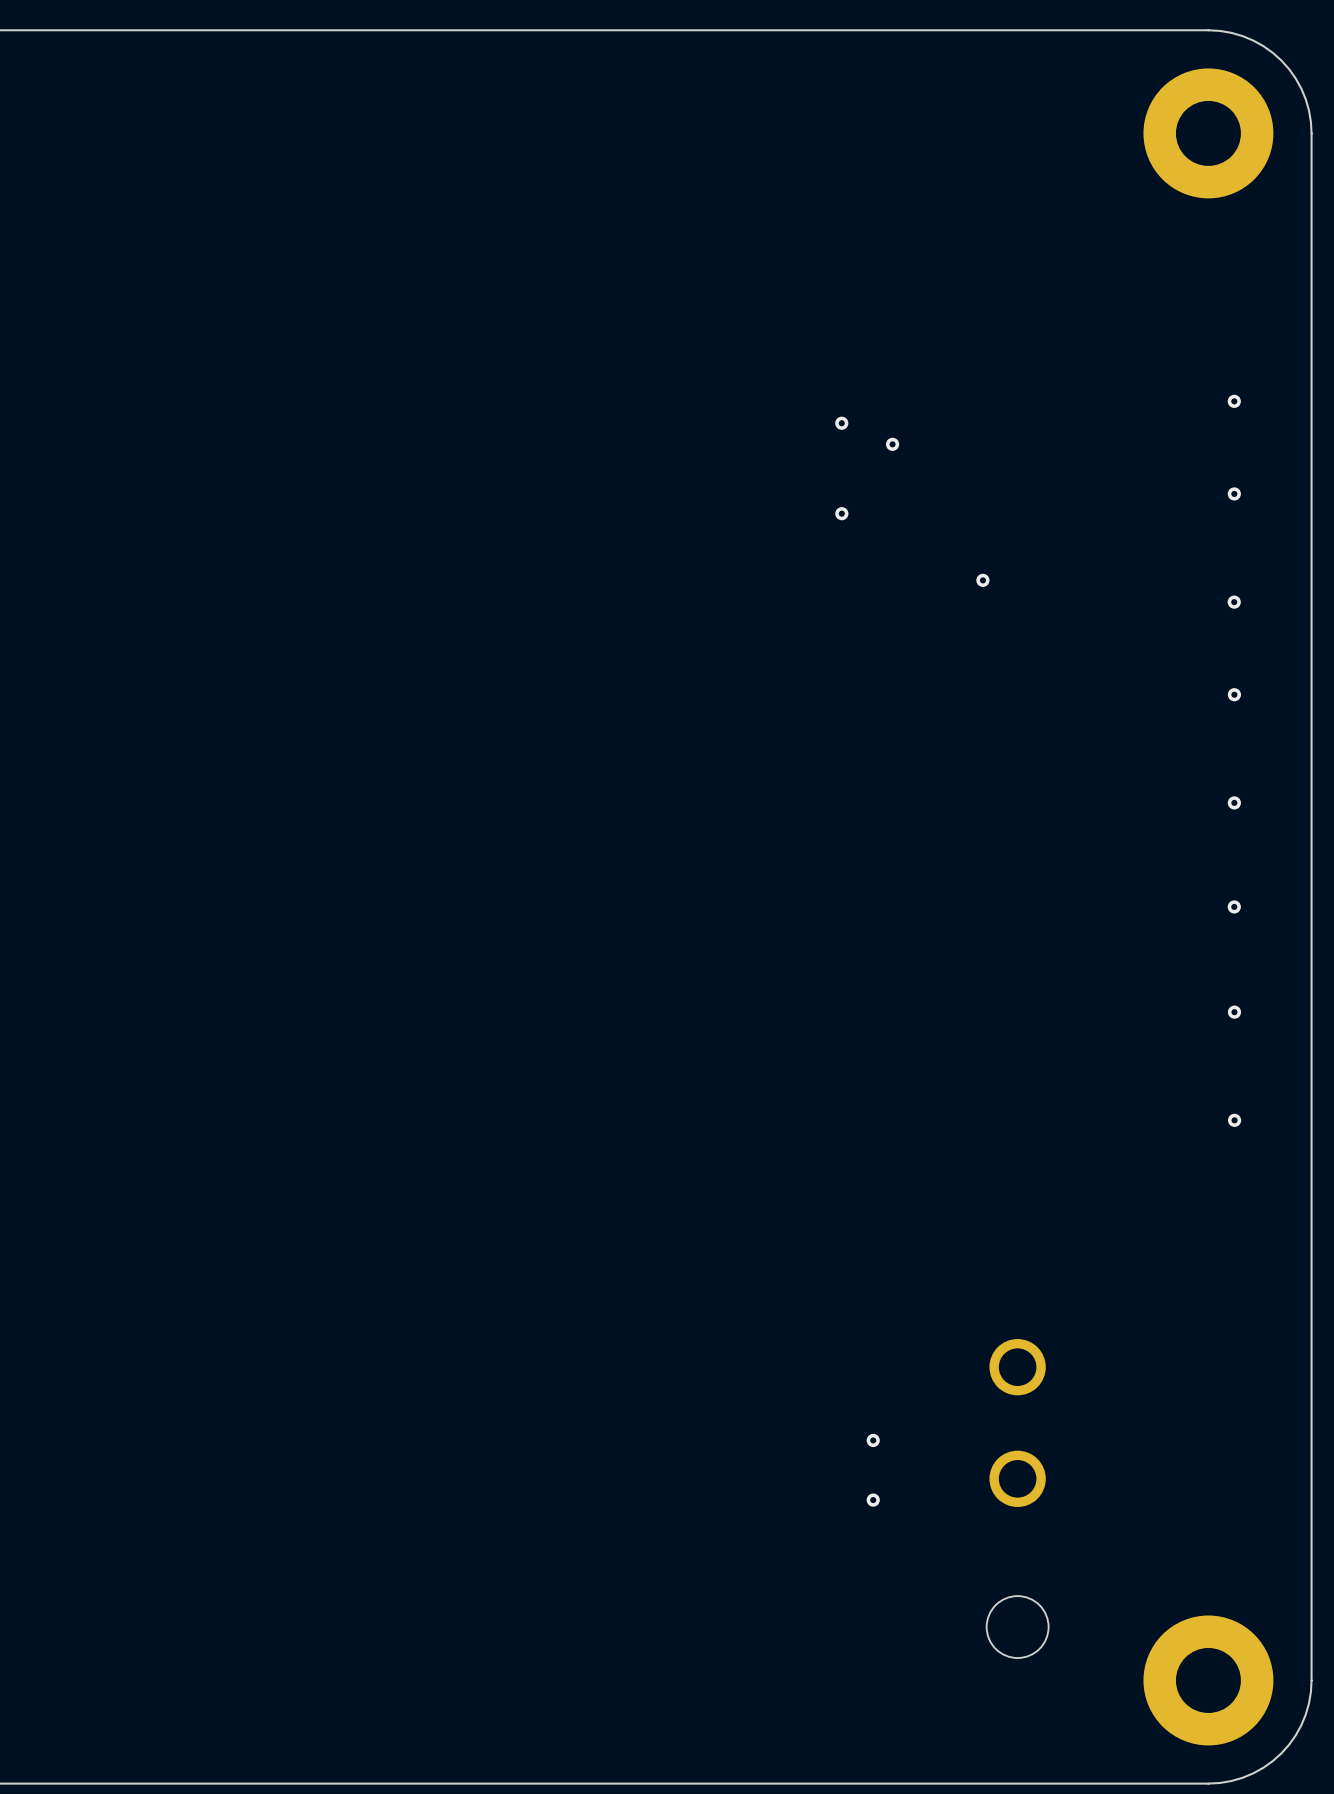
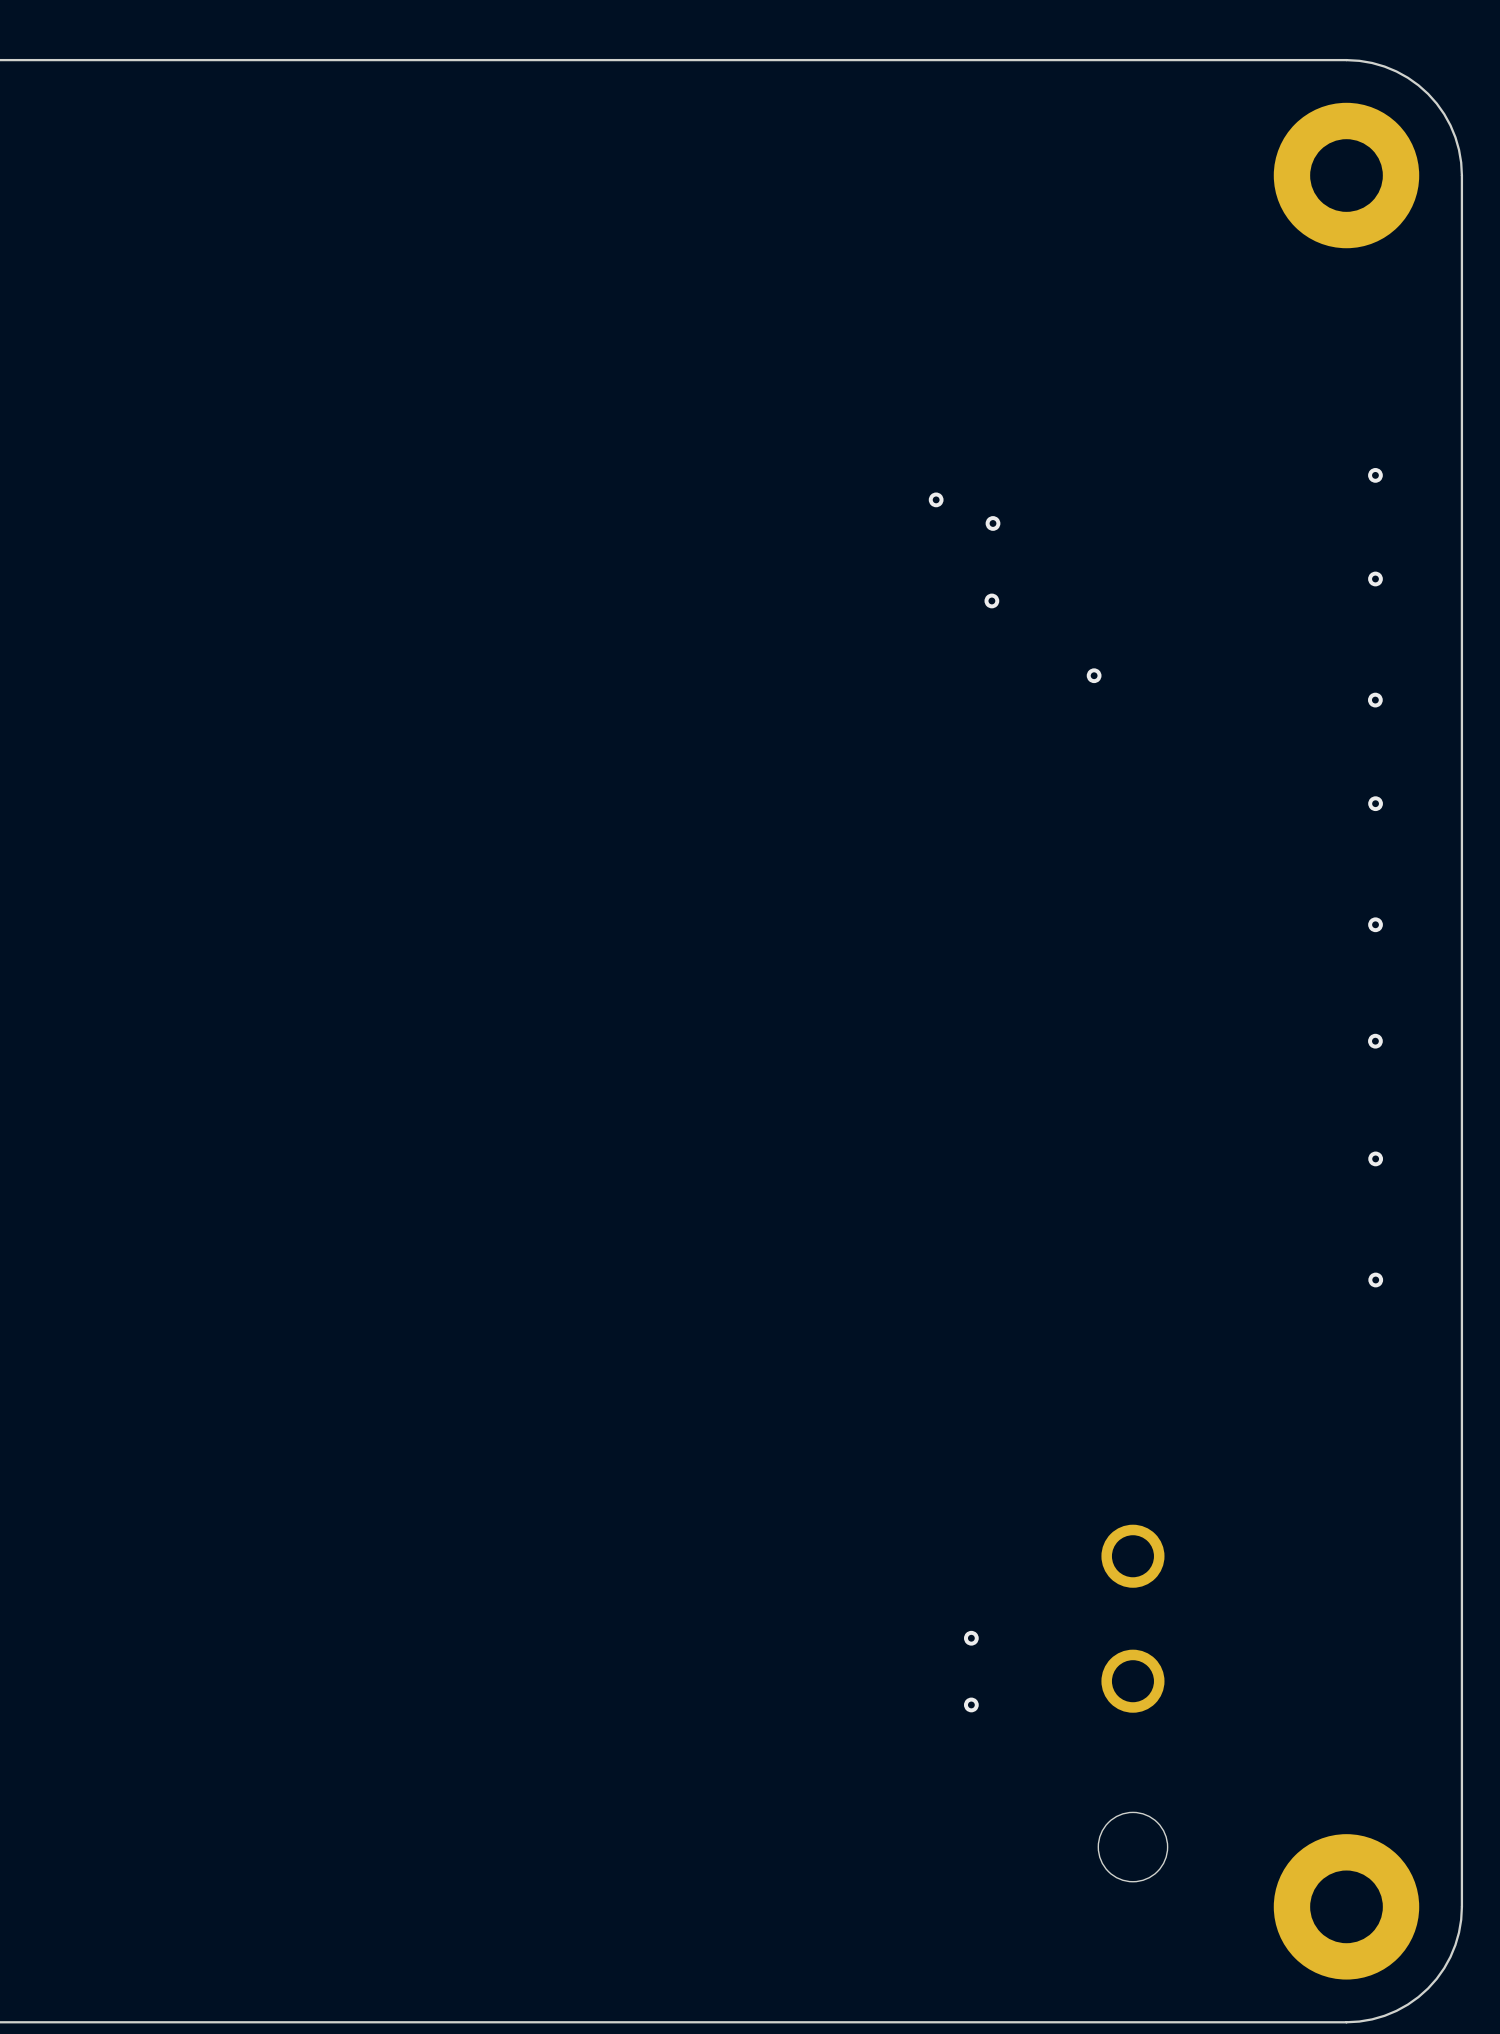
via position: (841, 513) -> (991, 600)

